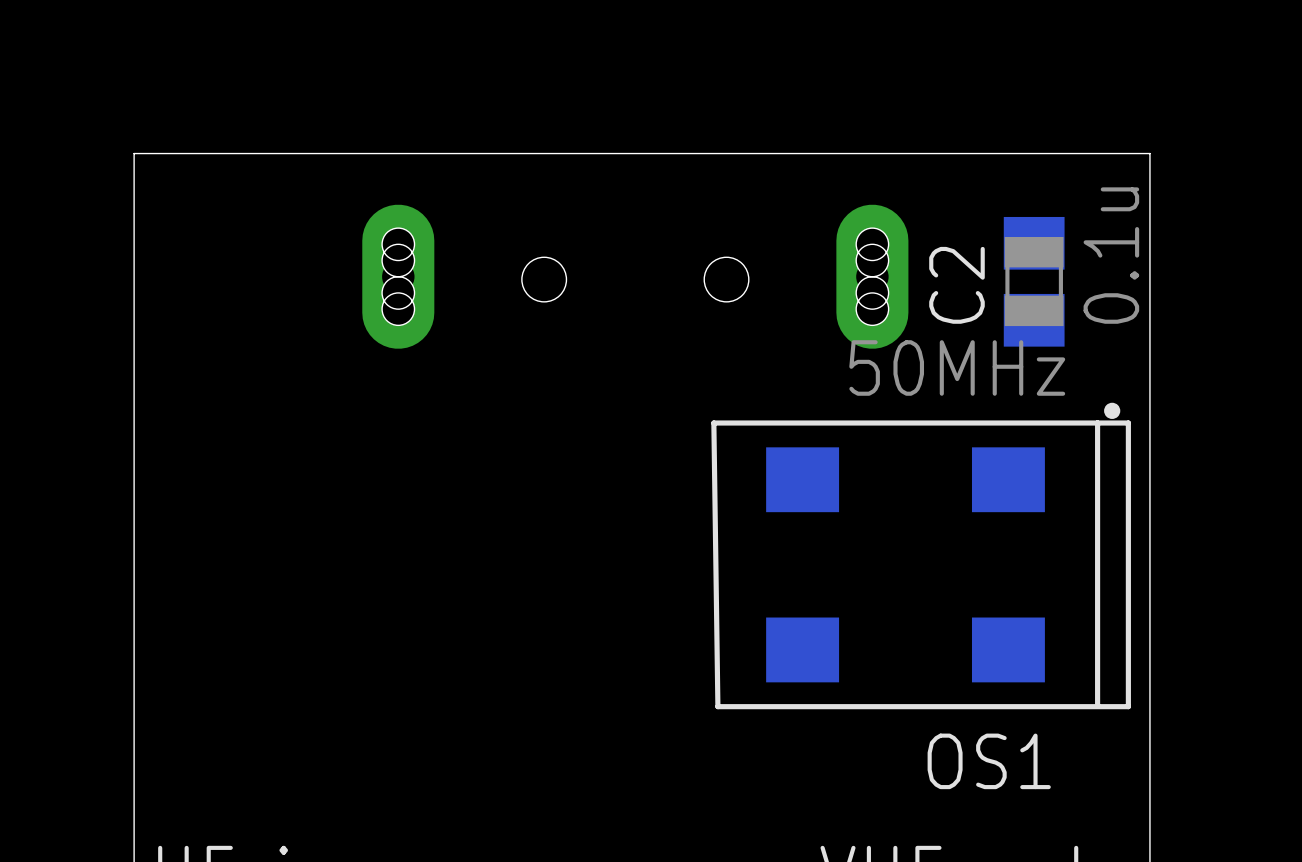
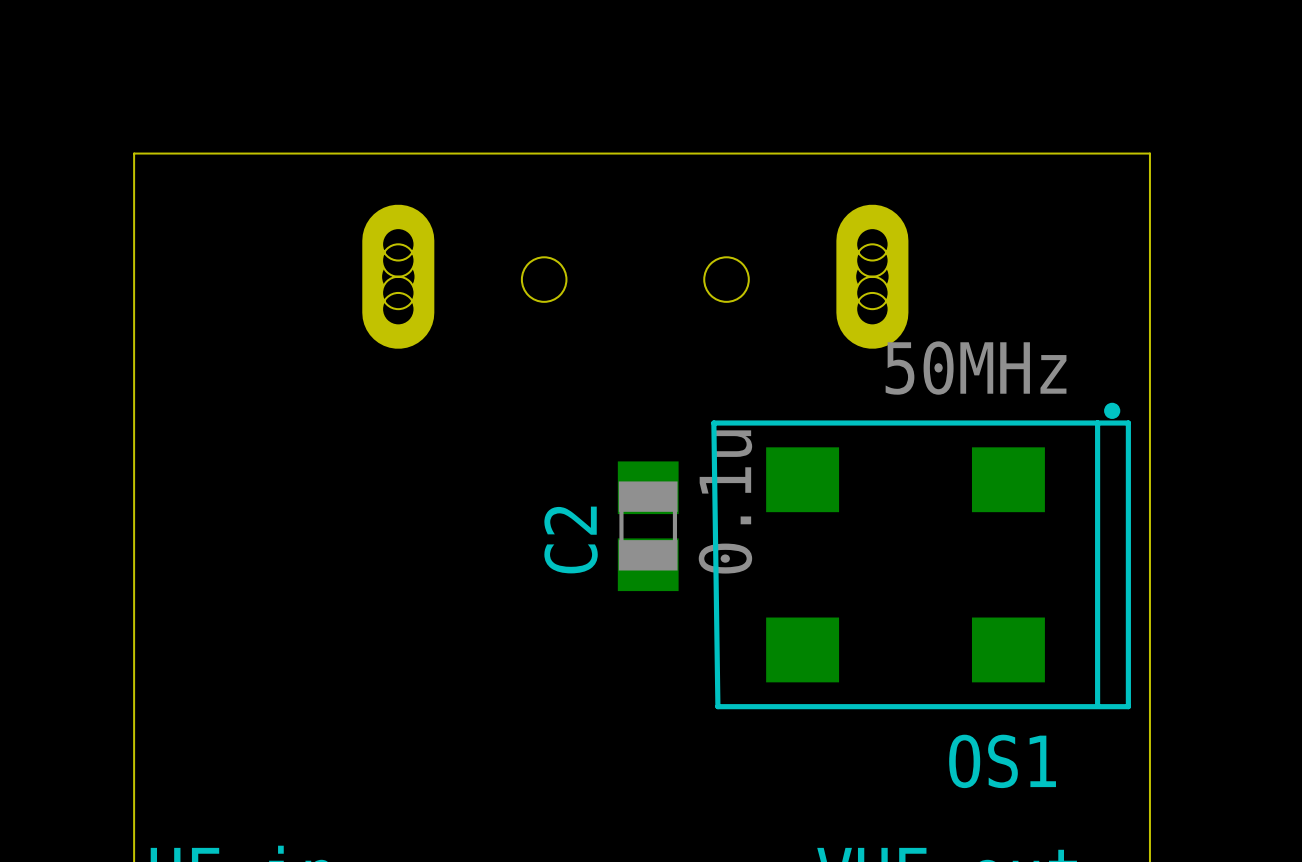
C2 position: (1034, 281) -> (648, 526)

